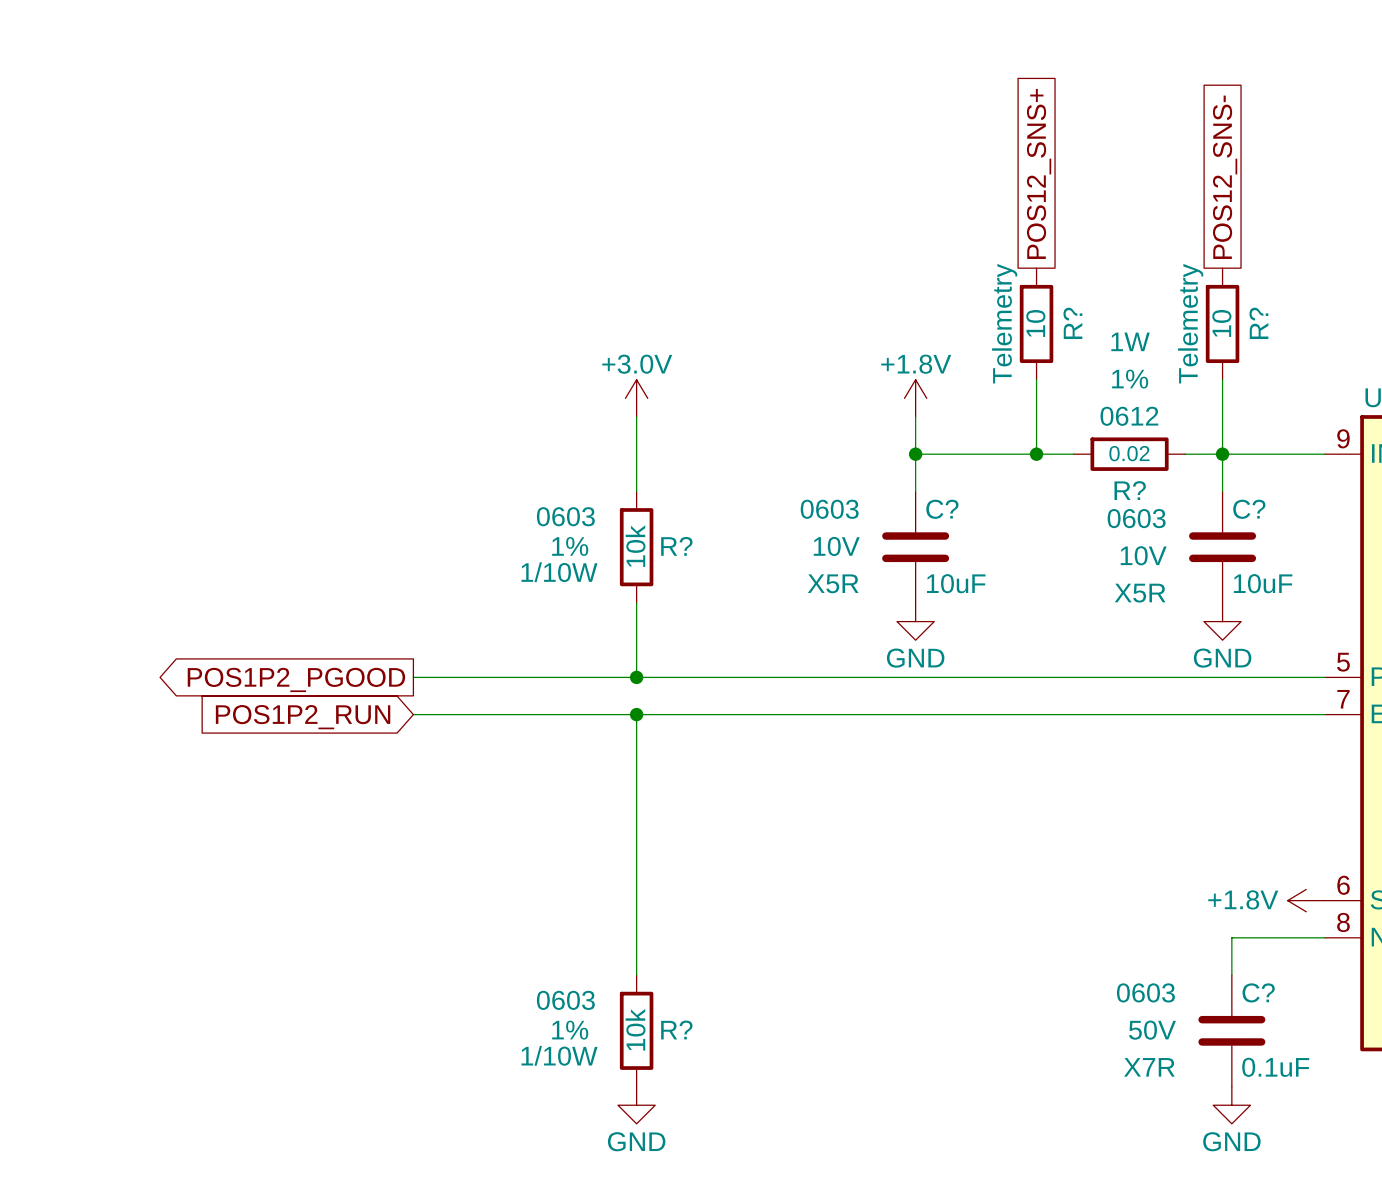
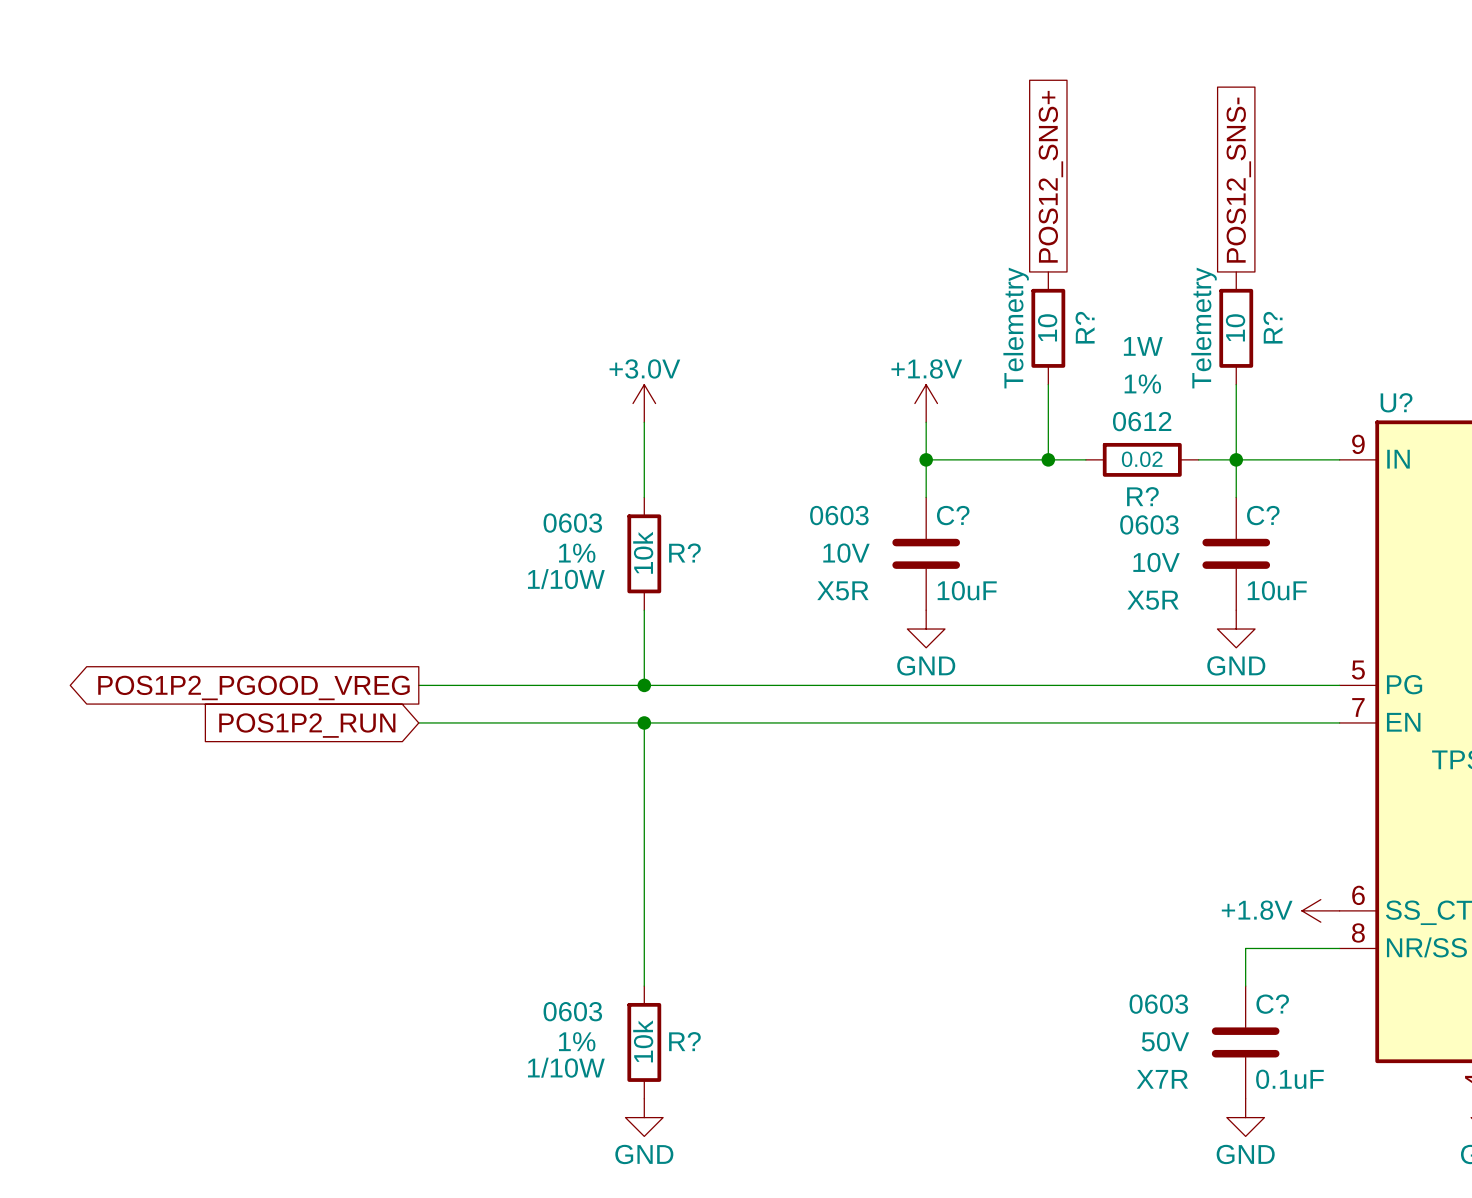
global label: POS1P2_PGOOD (296, 679) -> POS1P2_PGOOD_VREG (253, 687)

